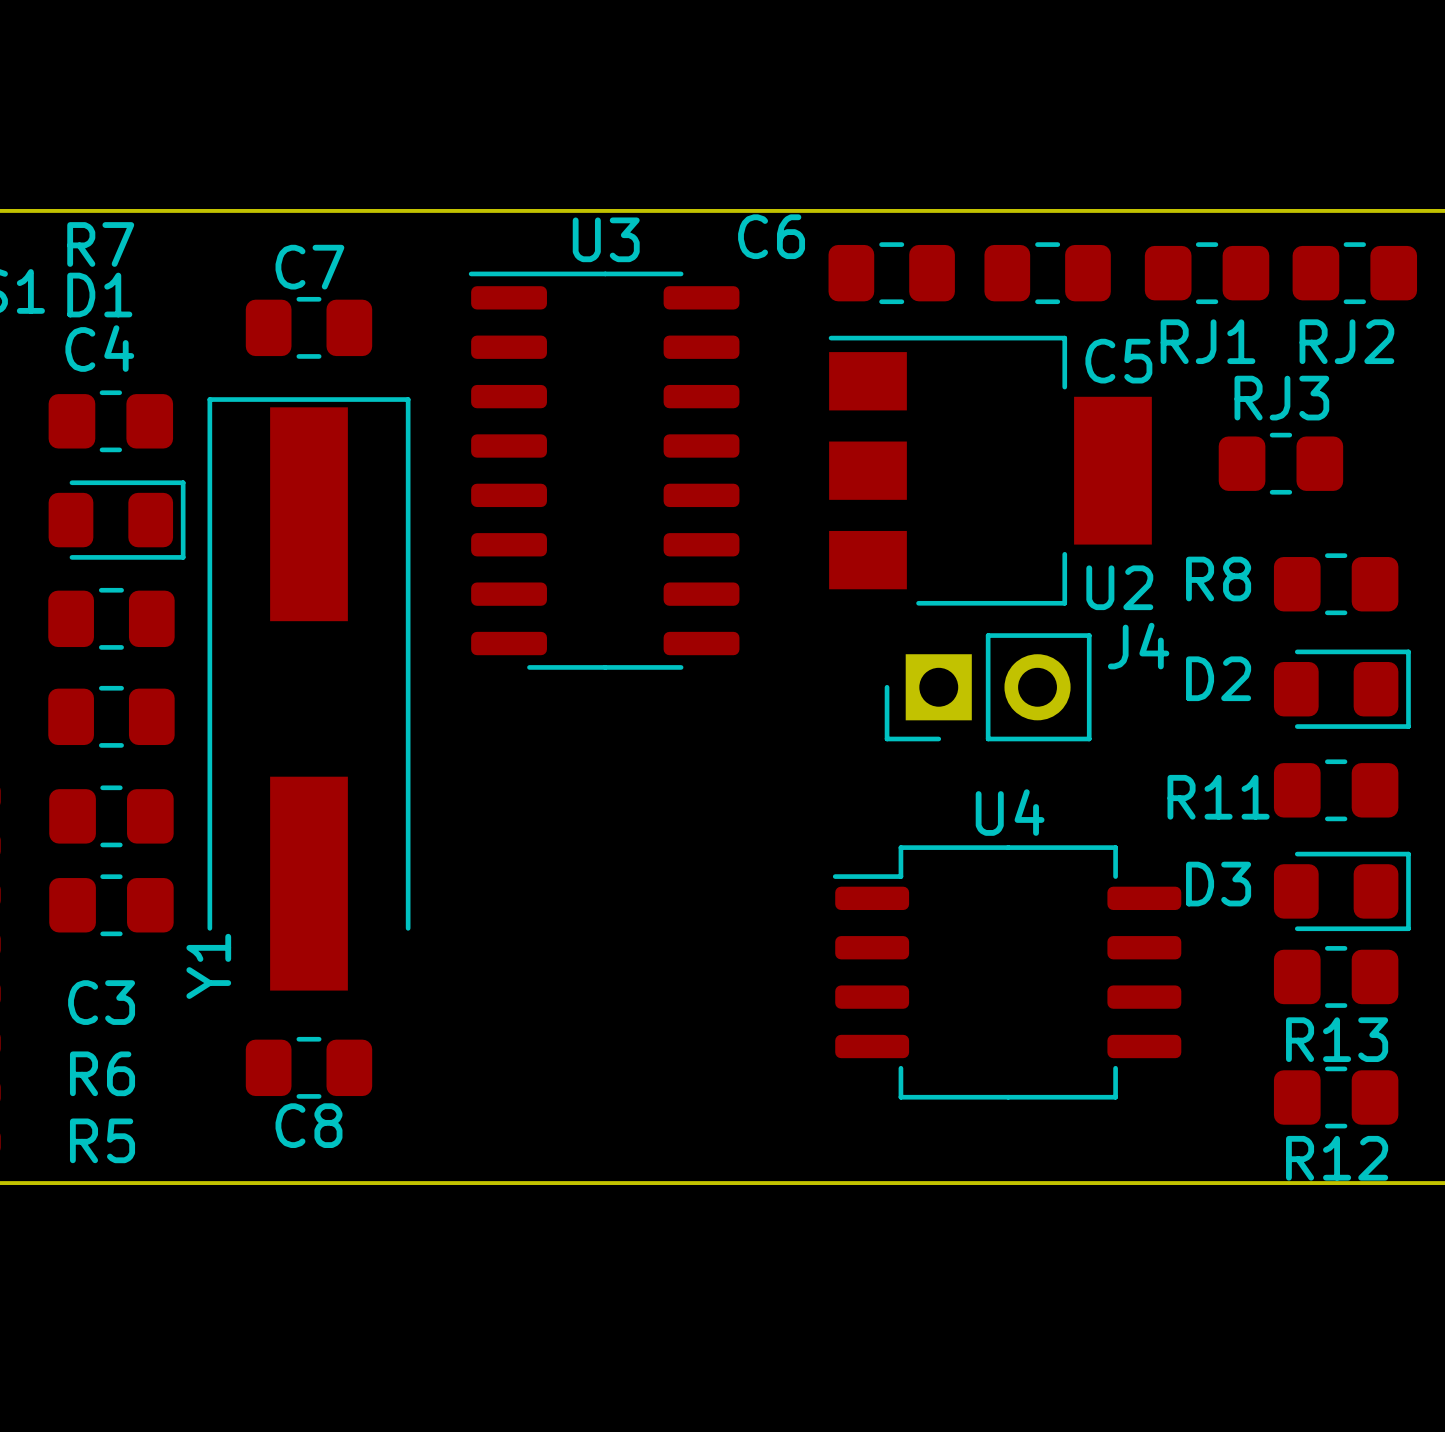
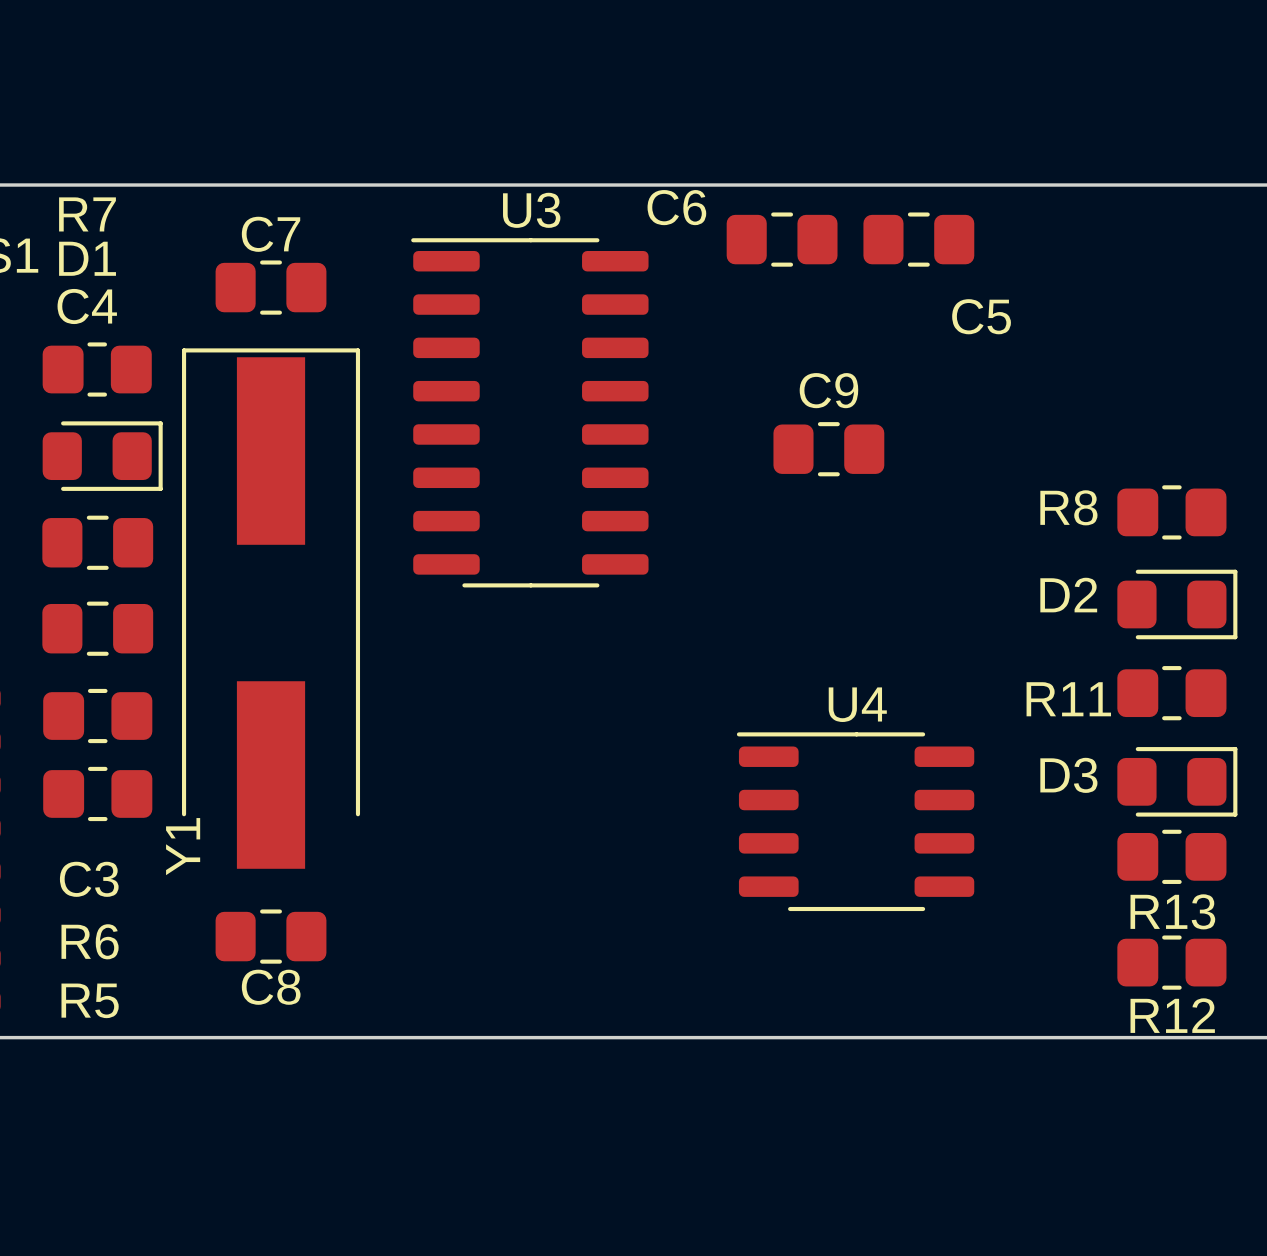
RJ1: (1207, 273) -> none
RJ2: (1354, 273) -> none
RJ3: (1280, 463) -> none
U2: (990, 470) -> none
C9: none -> (828, 449)
J4: (988, 687) -> none
U4 footprint: [832, 845, 1182, 1100] -> [736, 732, 975, 912]

